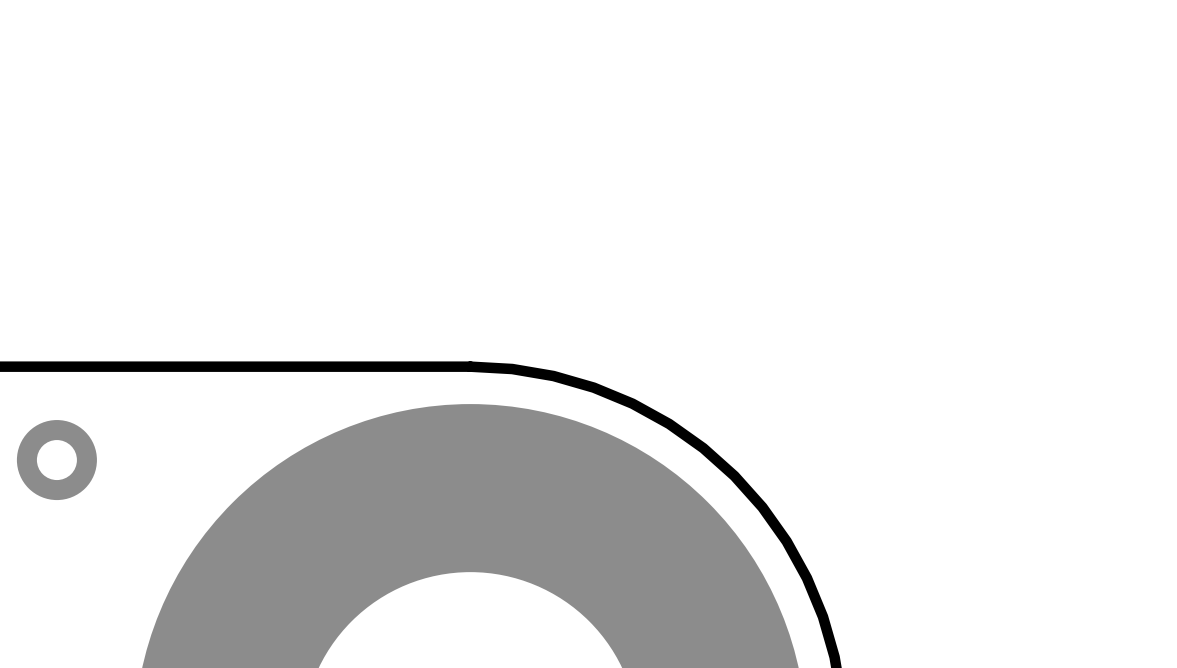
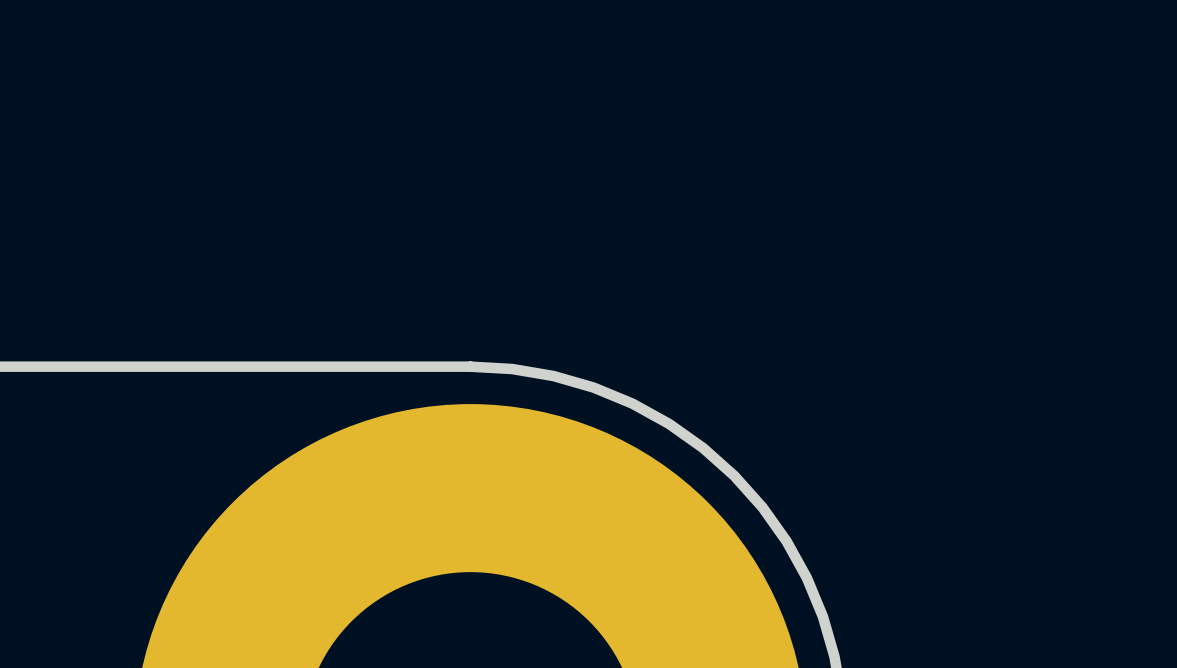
via: (56, 460) -> none

